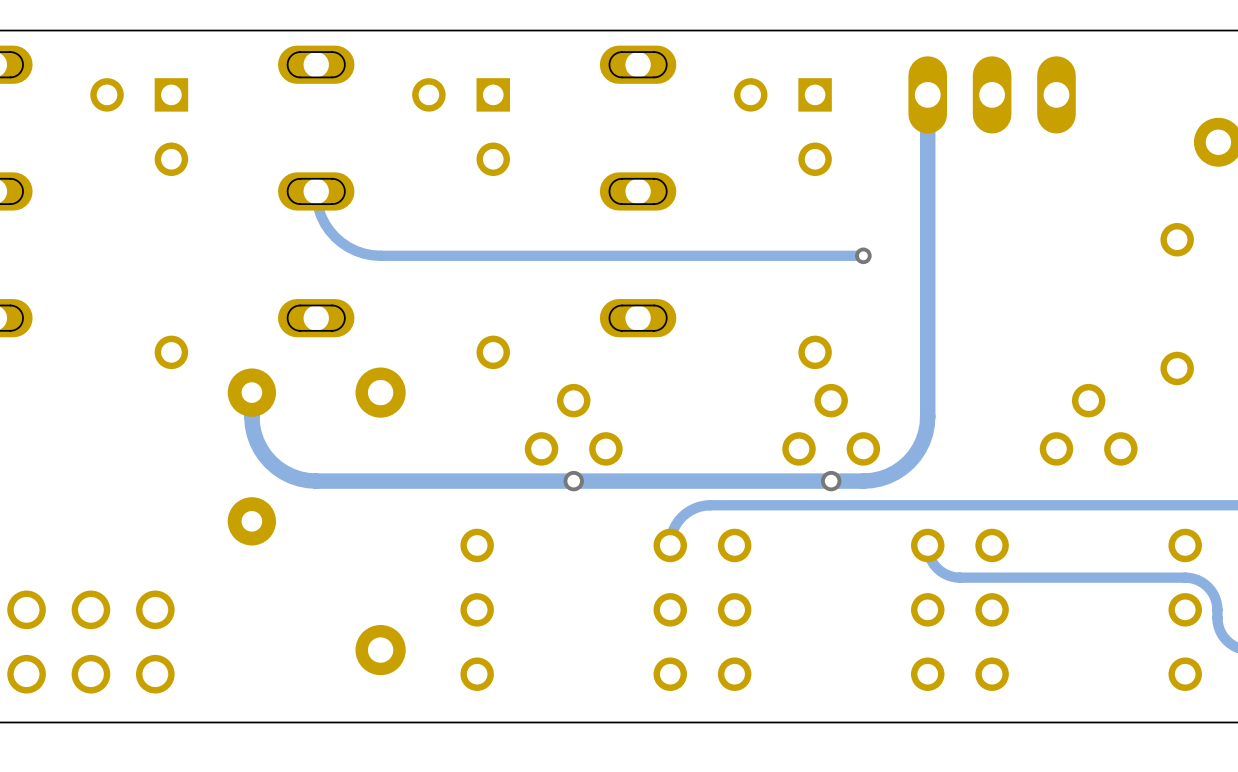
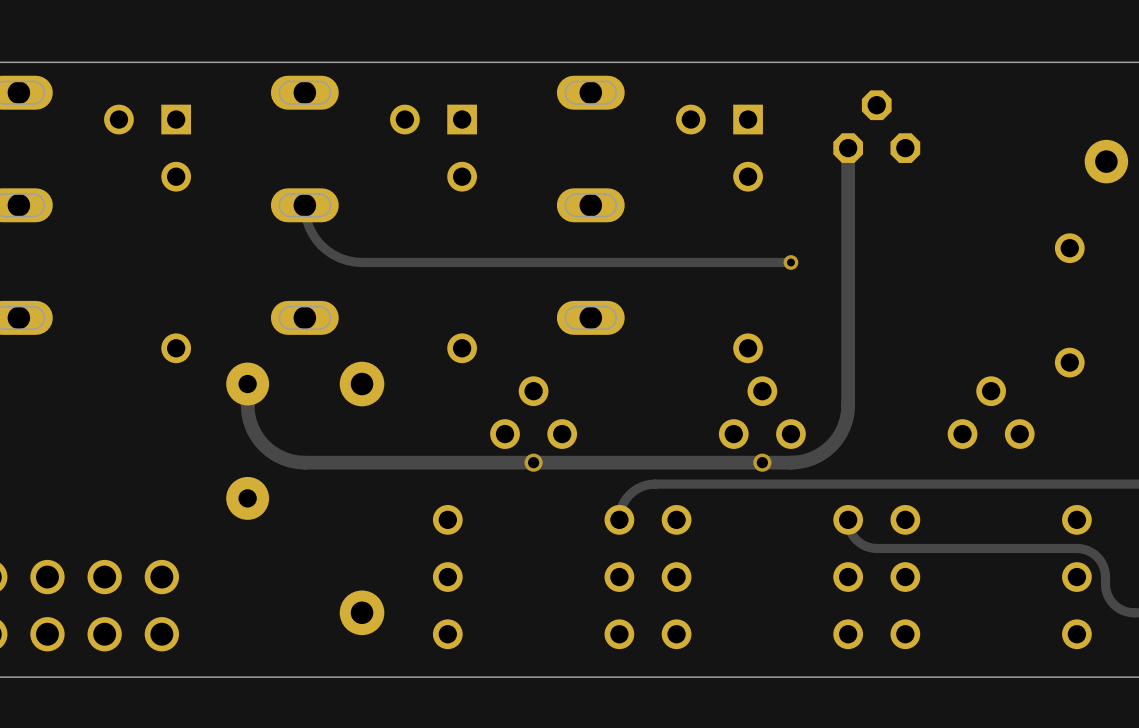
part: (992, 94) -> none
part: none -> (876, 126)

